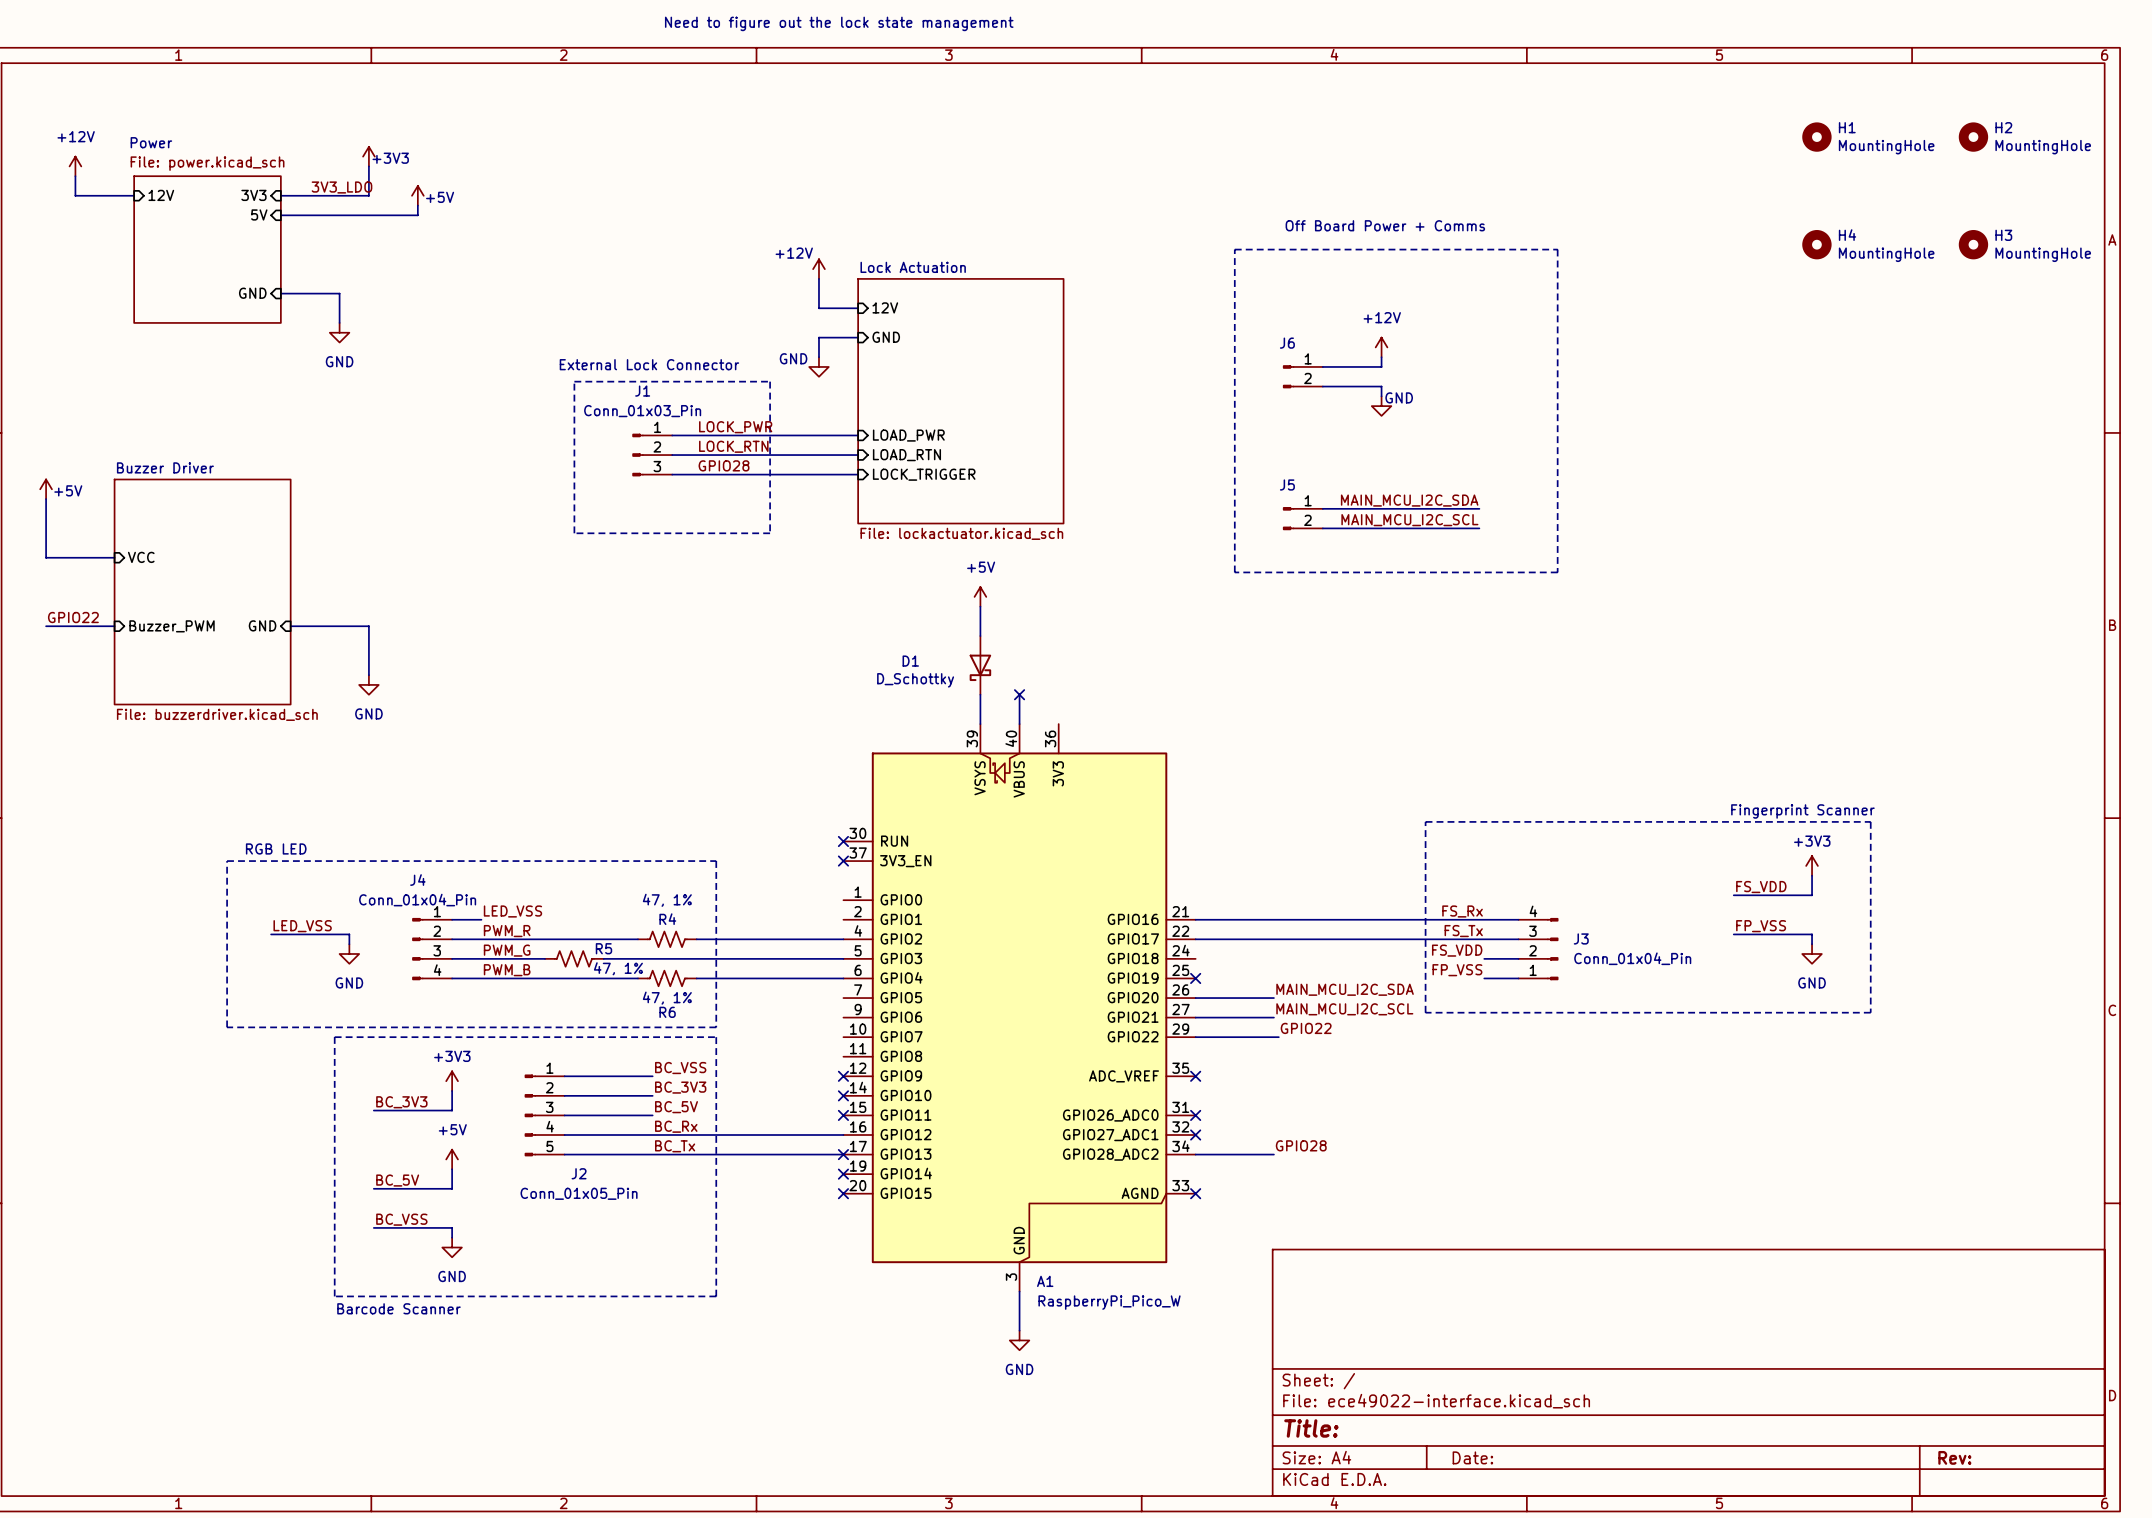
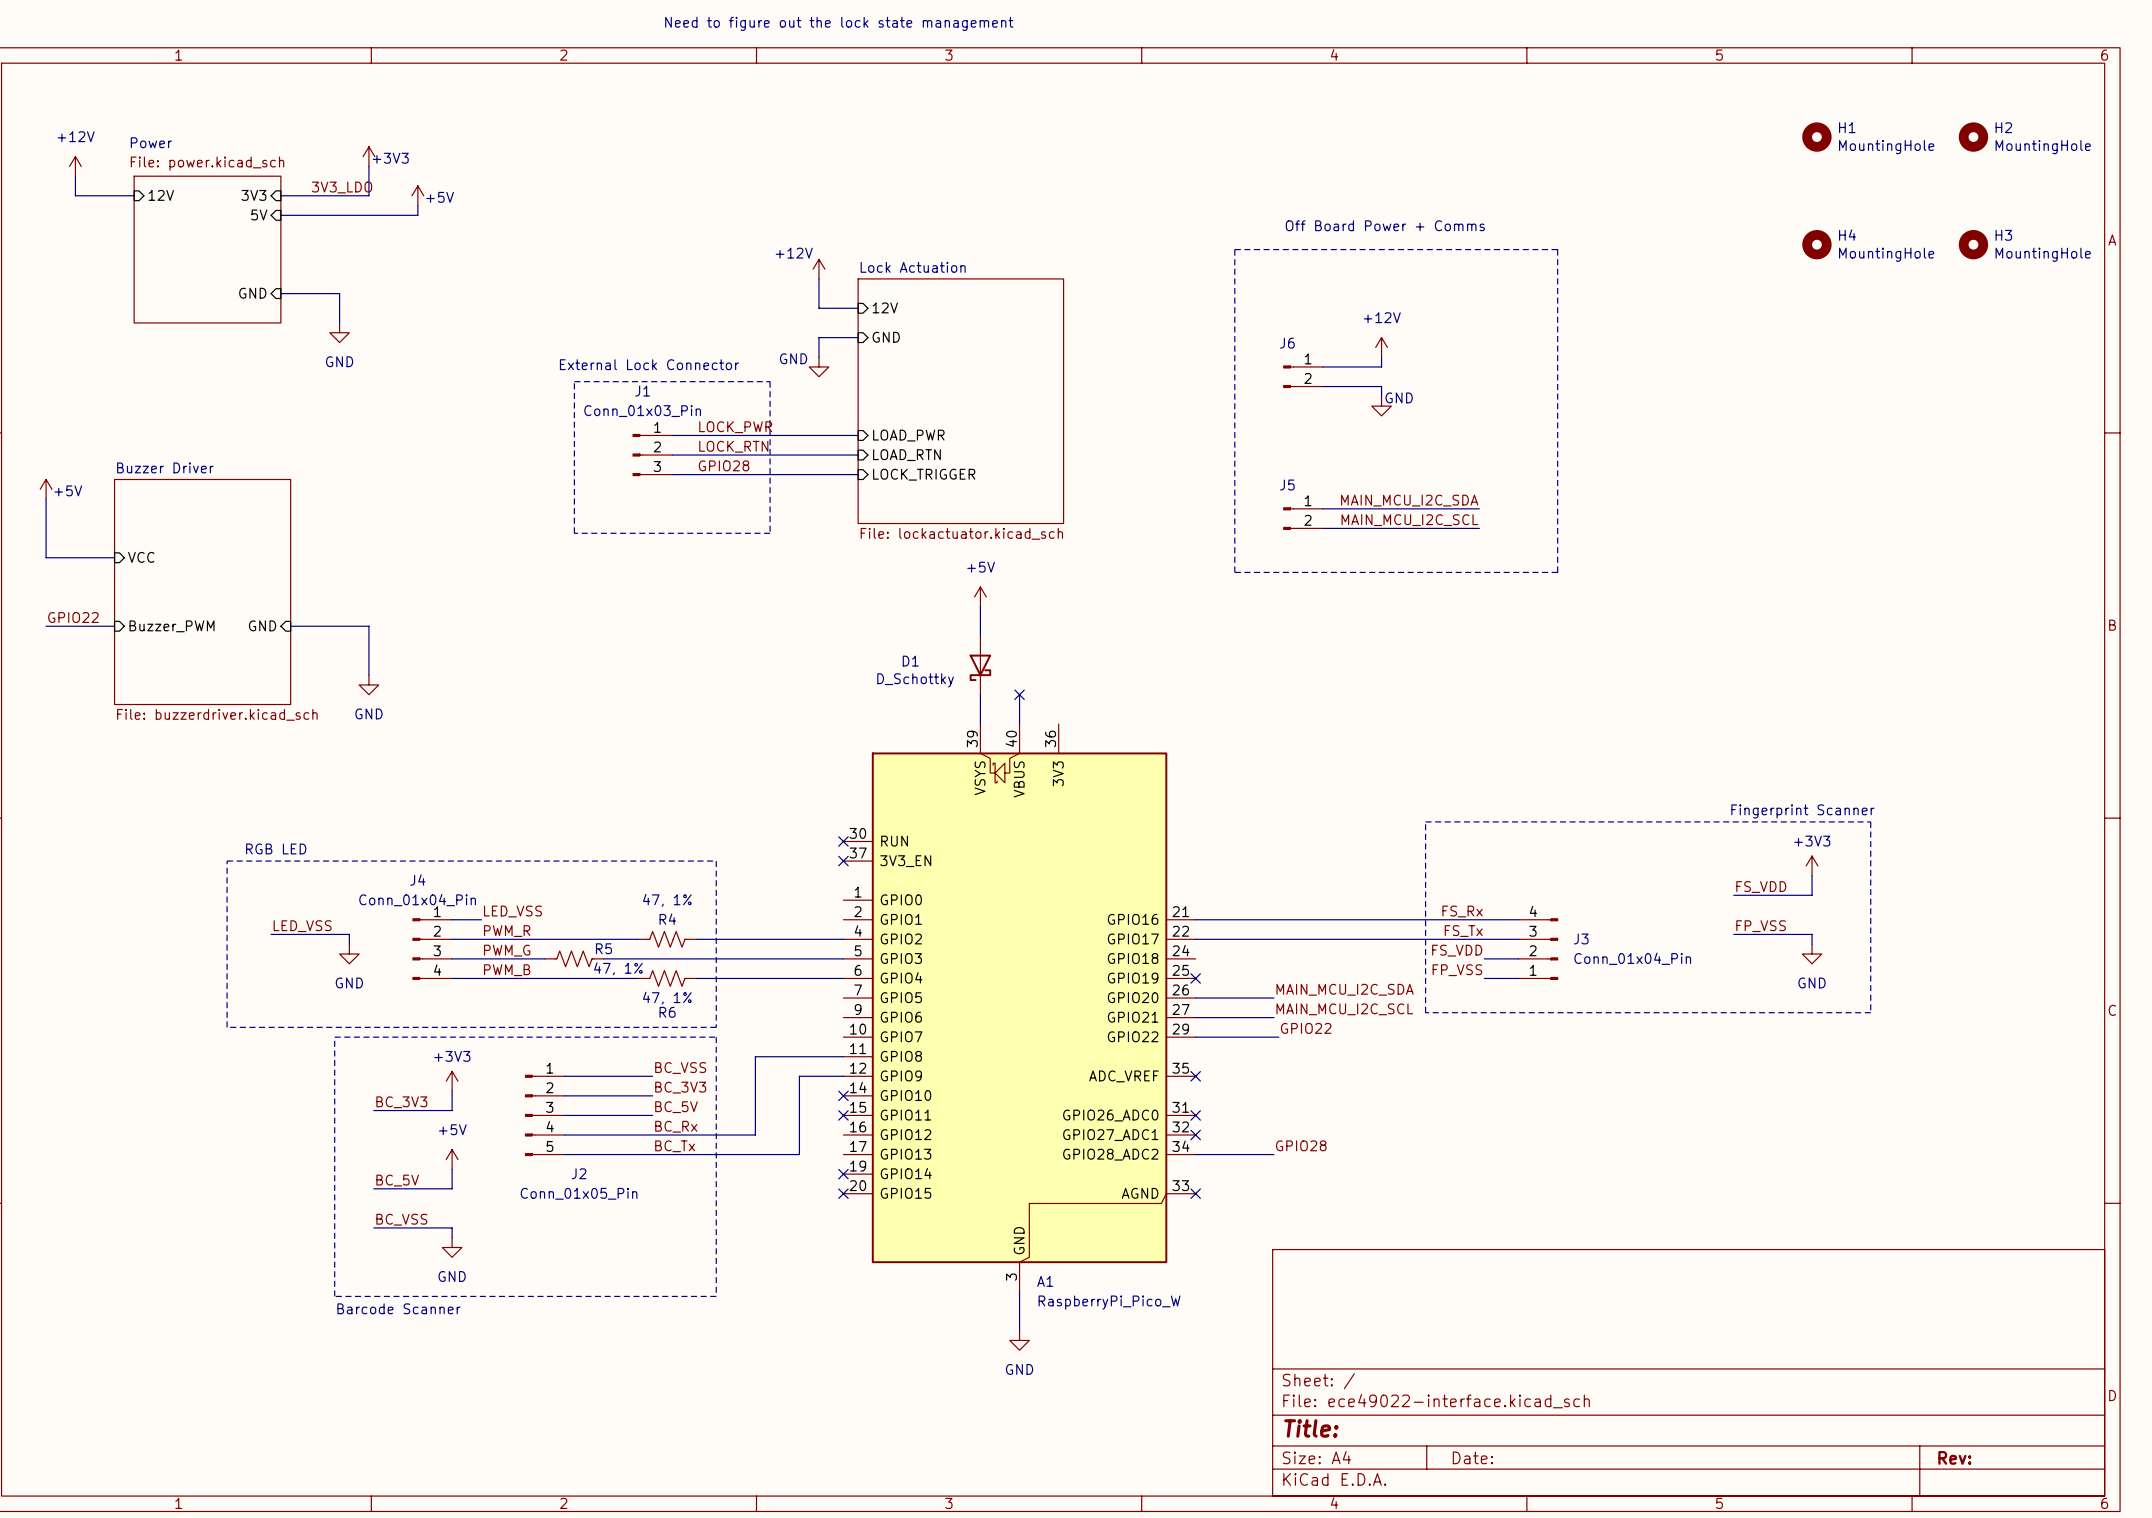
no-connect mark: (843, 1076) -> none
wire: (755, 1135) (843, 1135) -> (755, 1135) (755, 1056) (843, 1056)
wire: (799, 1154) (843, 1154) -> (799, 1154) (799, 1076) (843, 1076)
no-connect mark: (843, 1154) -> none

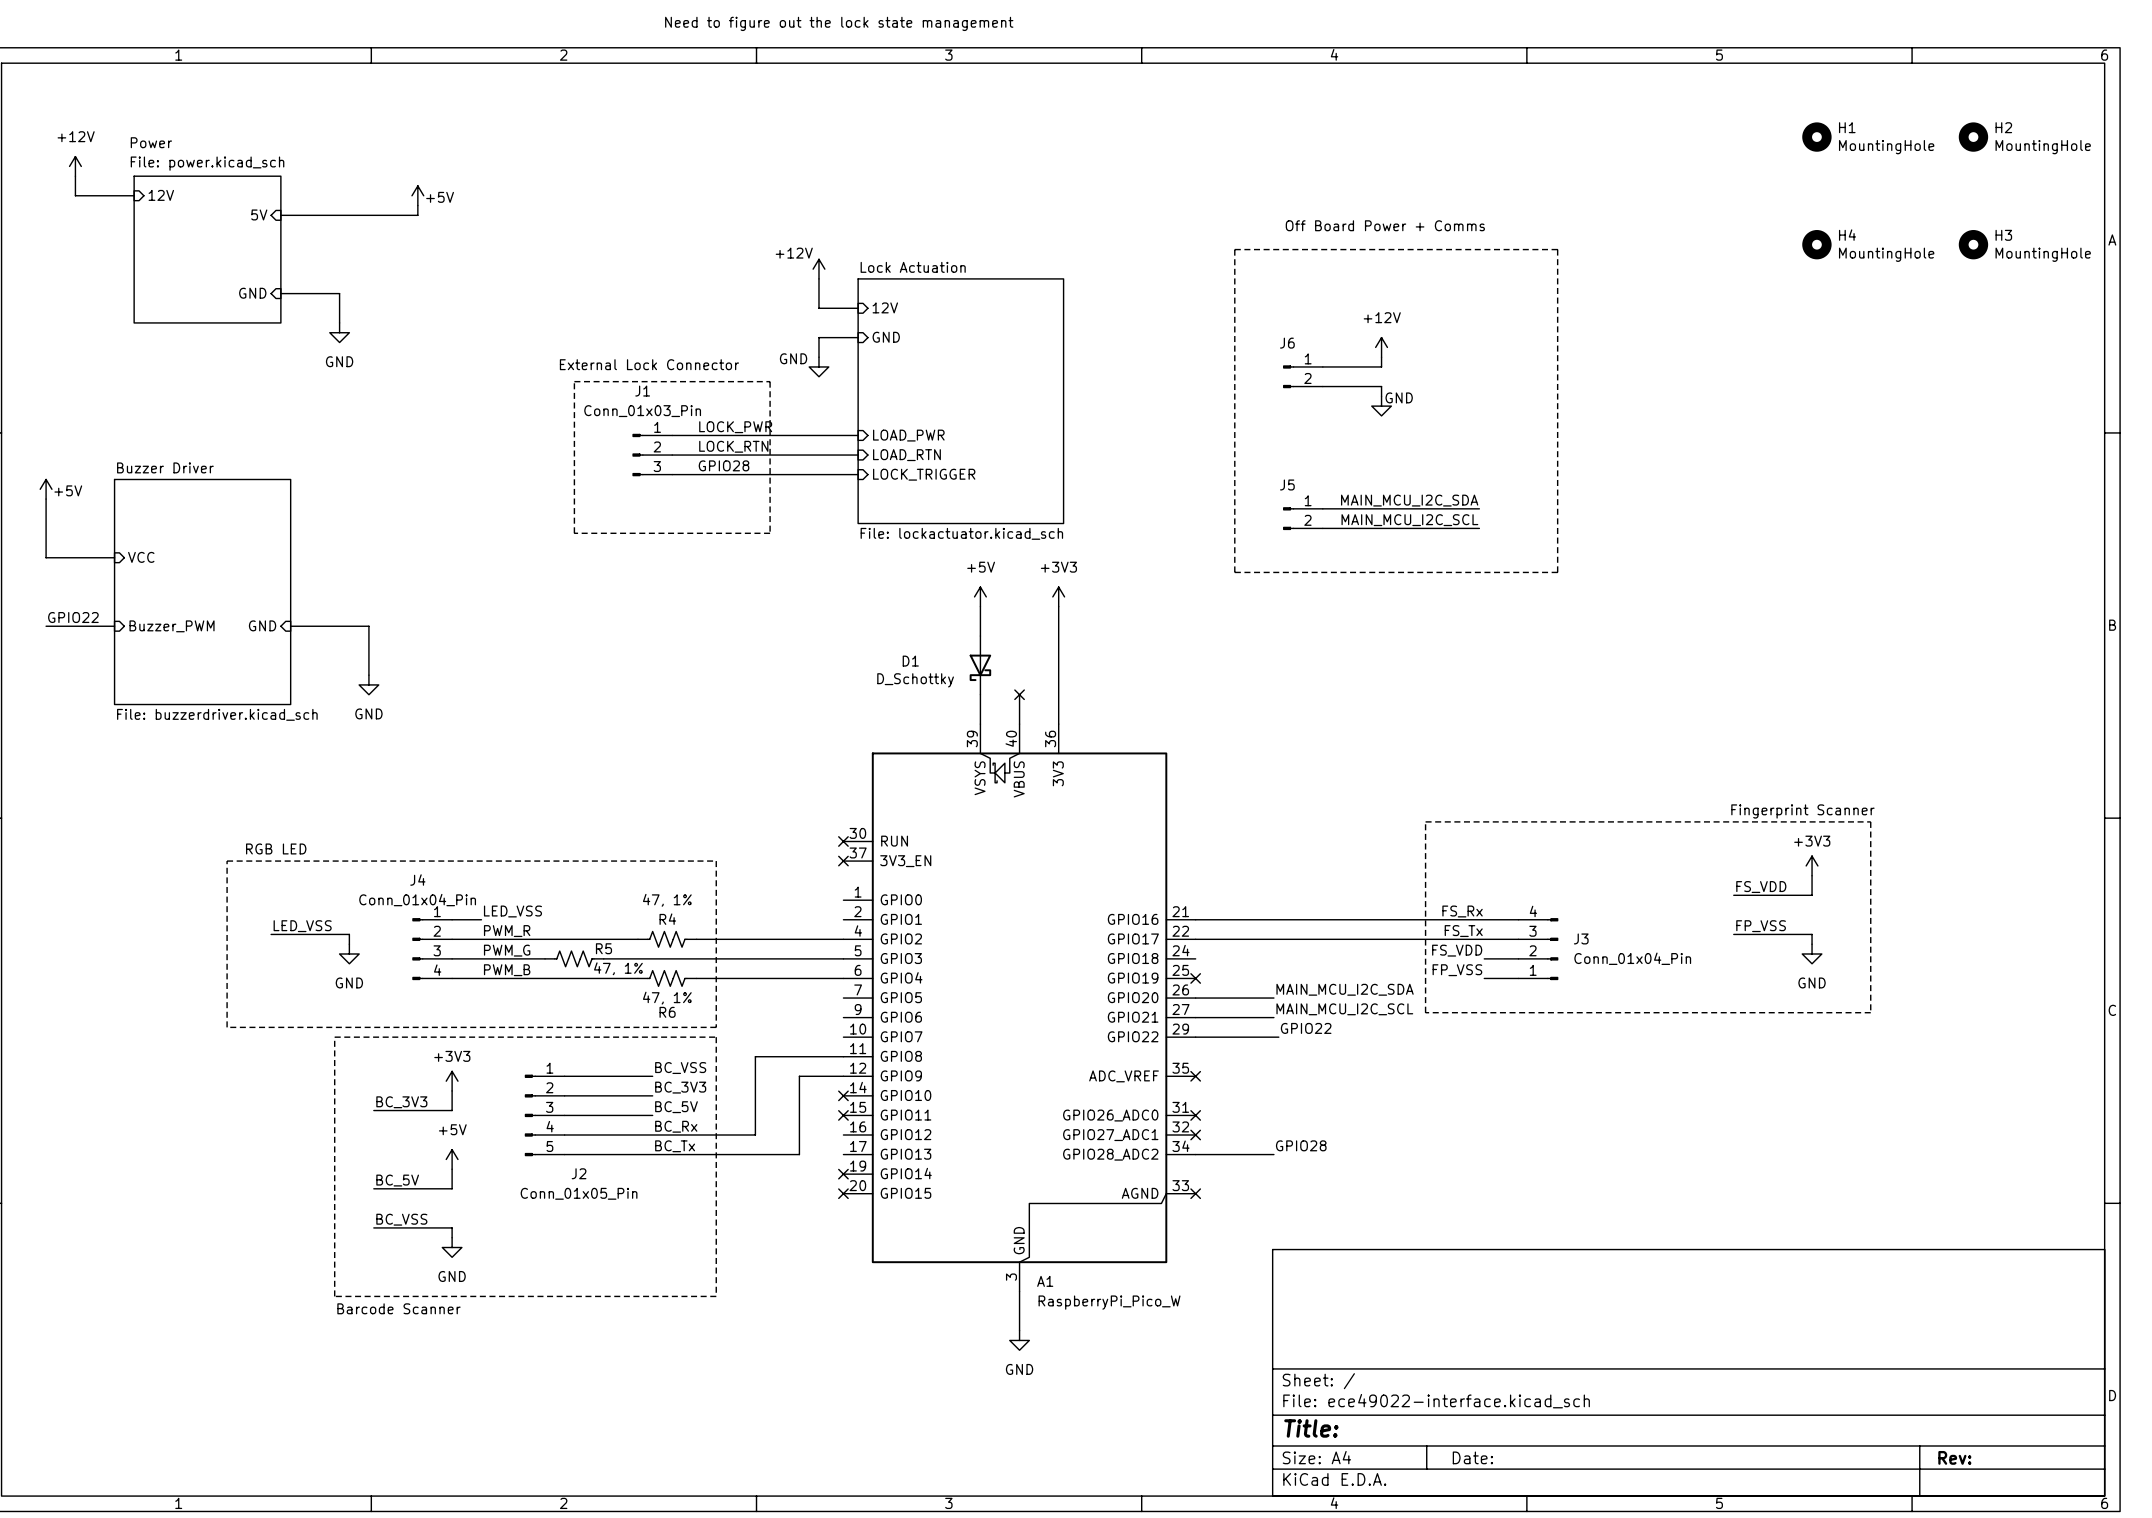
power symbol: +3V3 (368, 156) -> none
wire: (368, 166) (368, 195) (280, 195) -> none
label: 3V3_LDO (341, 187) -> none
sheet pin: 3V3 (253, 195) -> none
power symbol: none -> +3V3 (1058, 596)
wire: none -> (1058, 606) (1058, 724)

